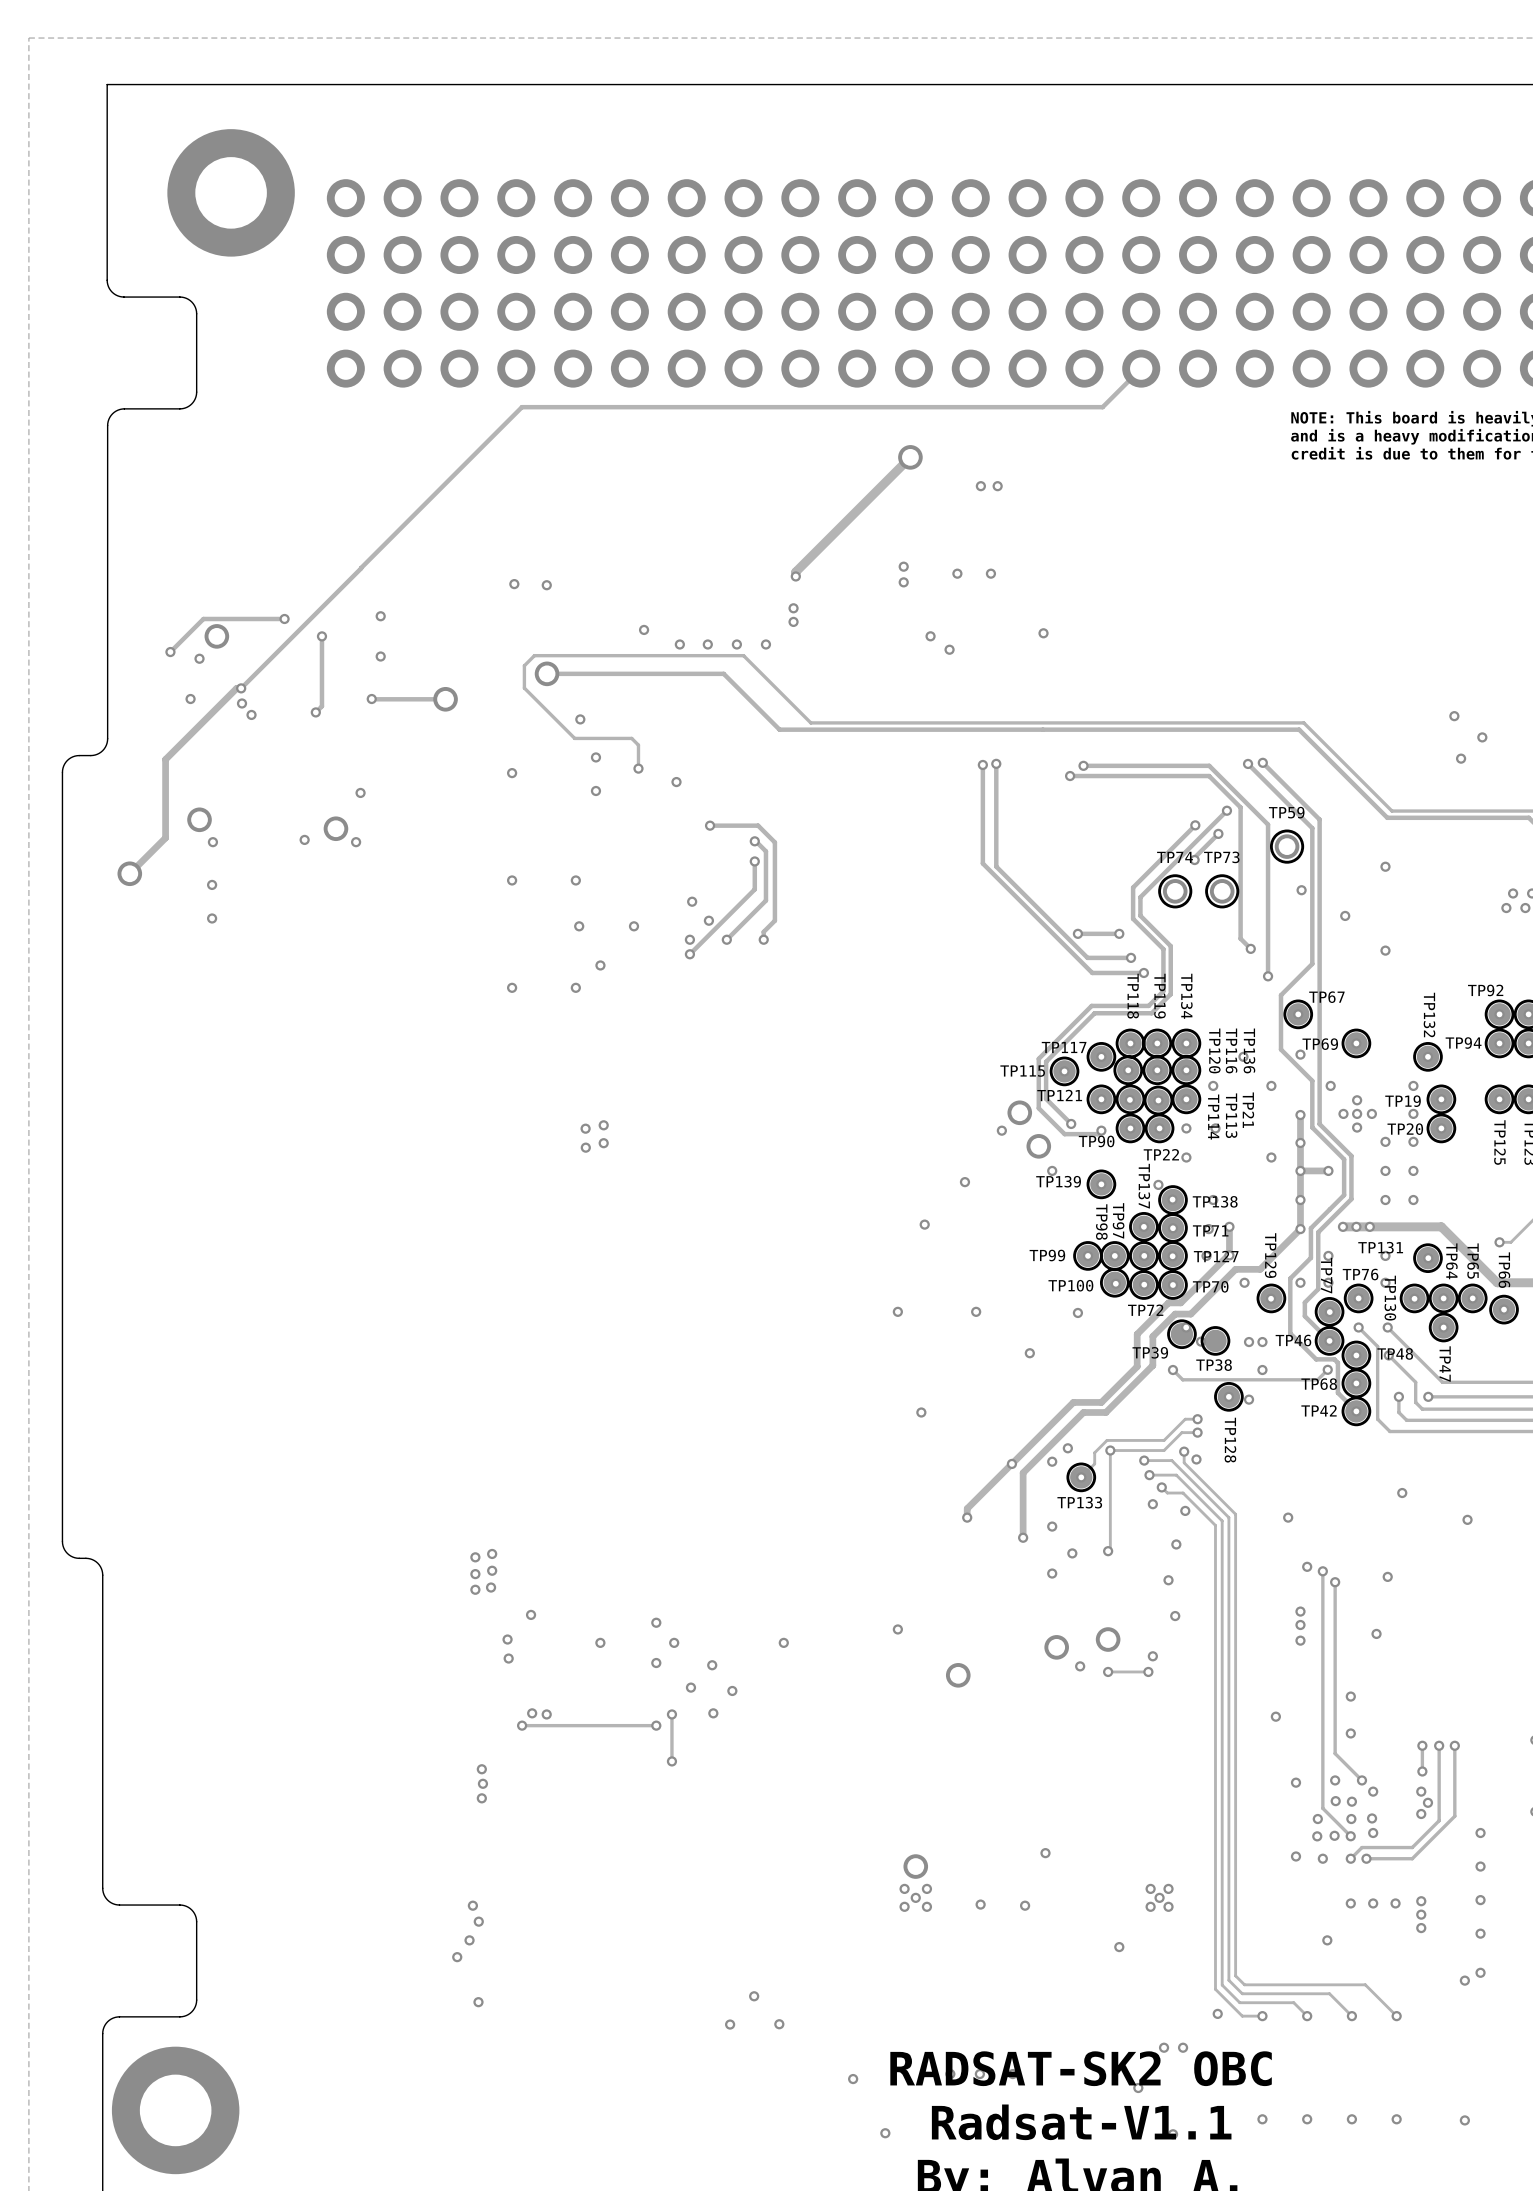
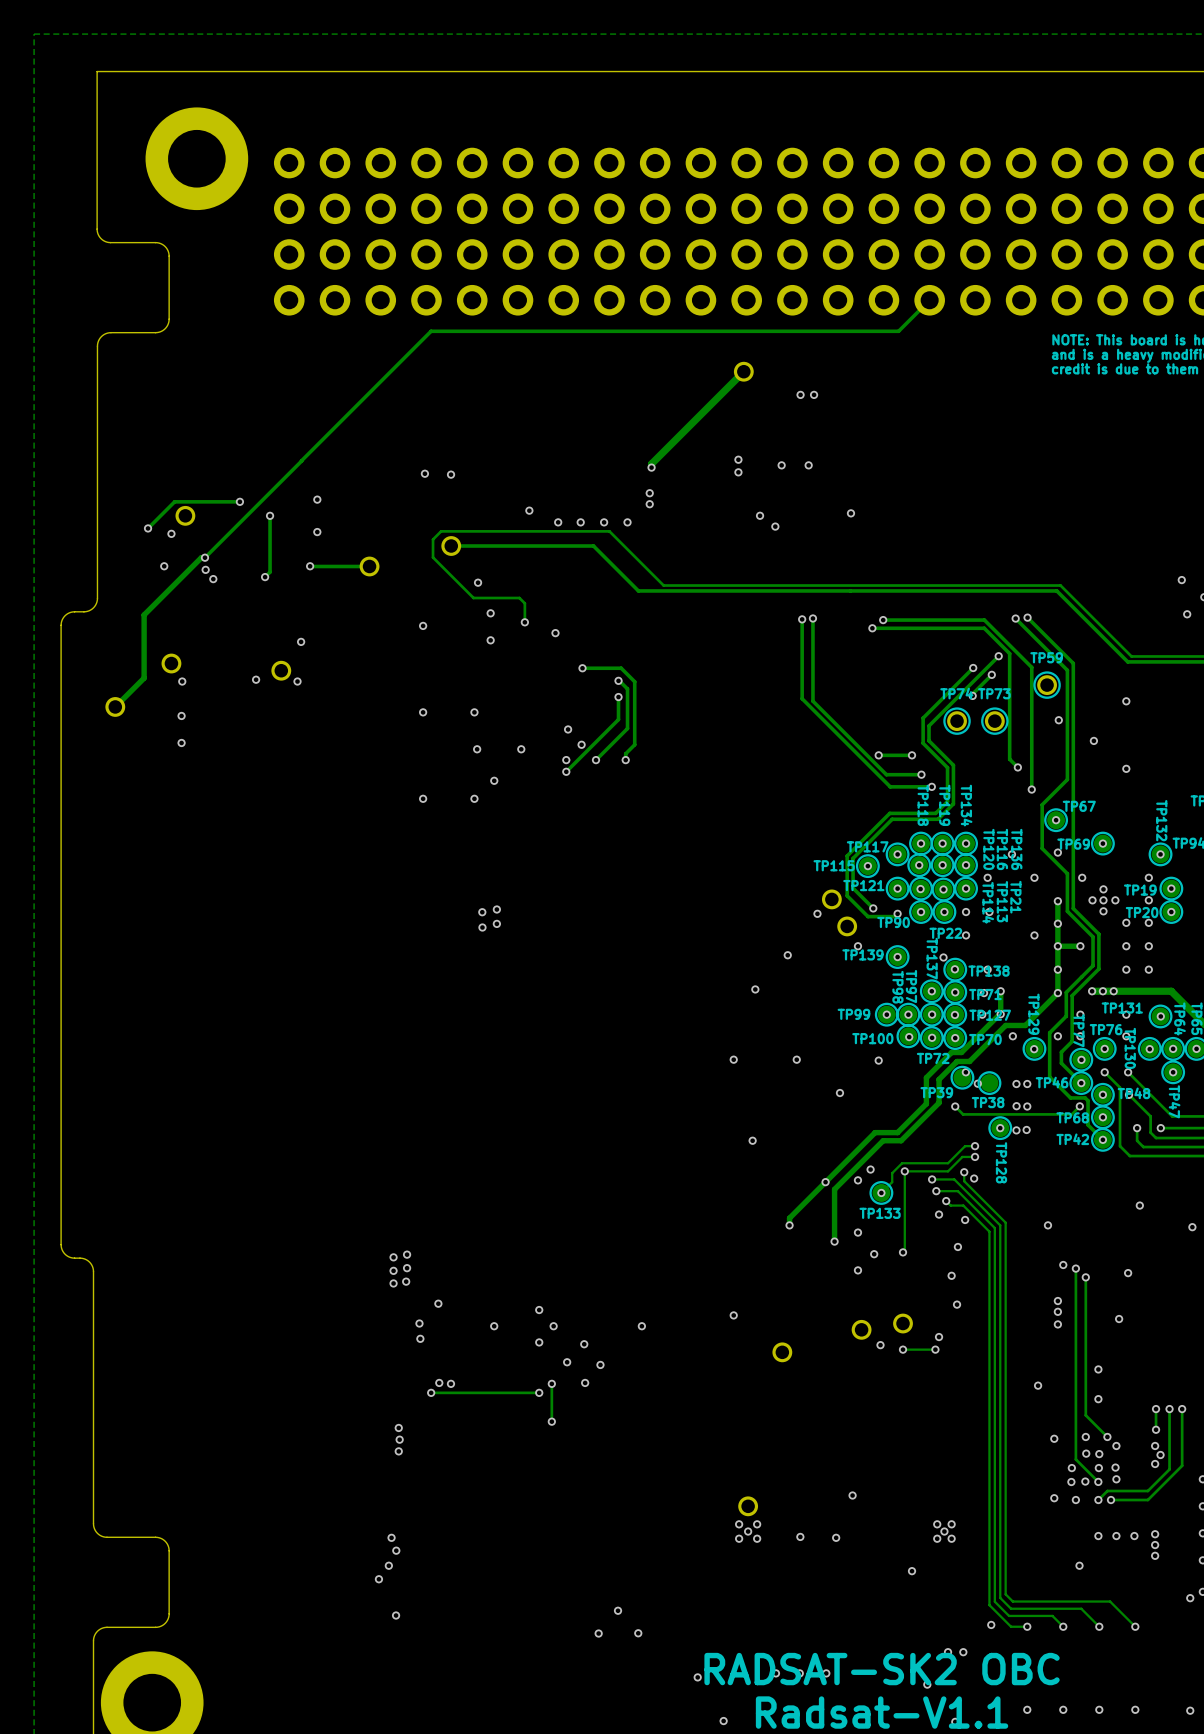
via: none -> (1016, 1106)
via: none -> (1026, 1129)

